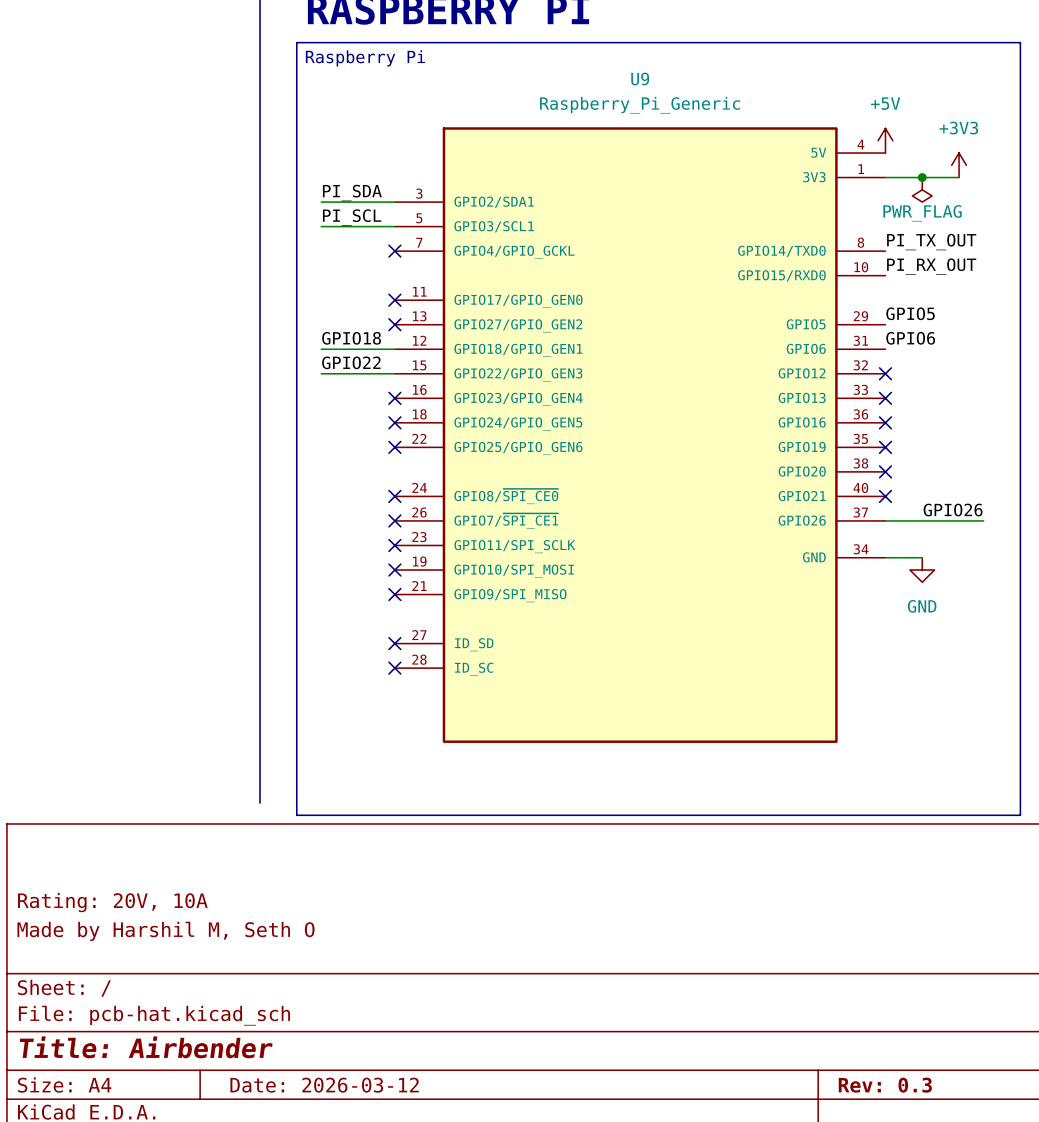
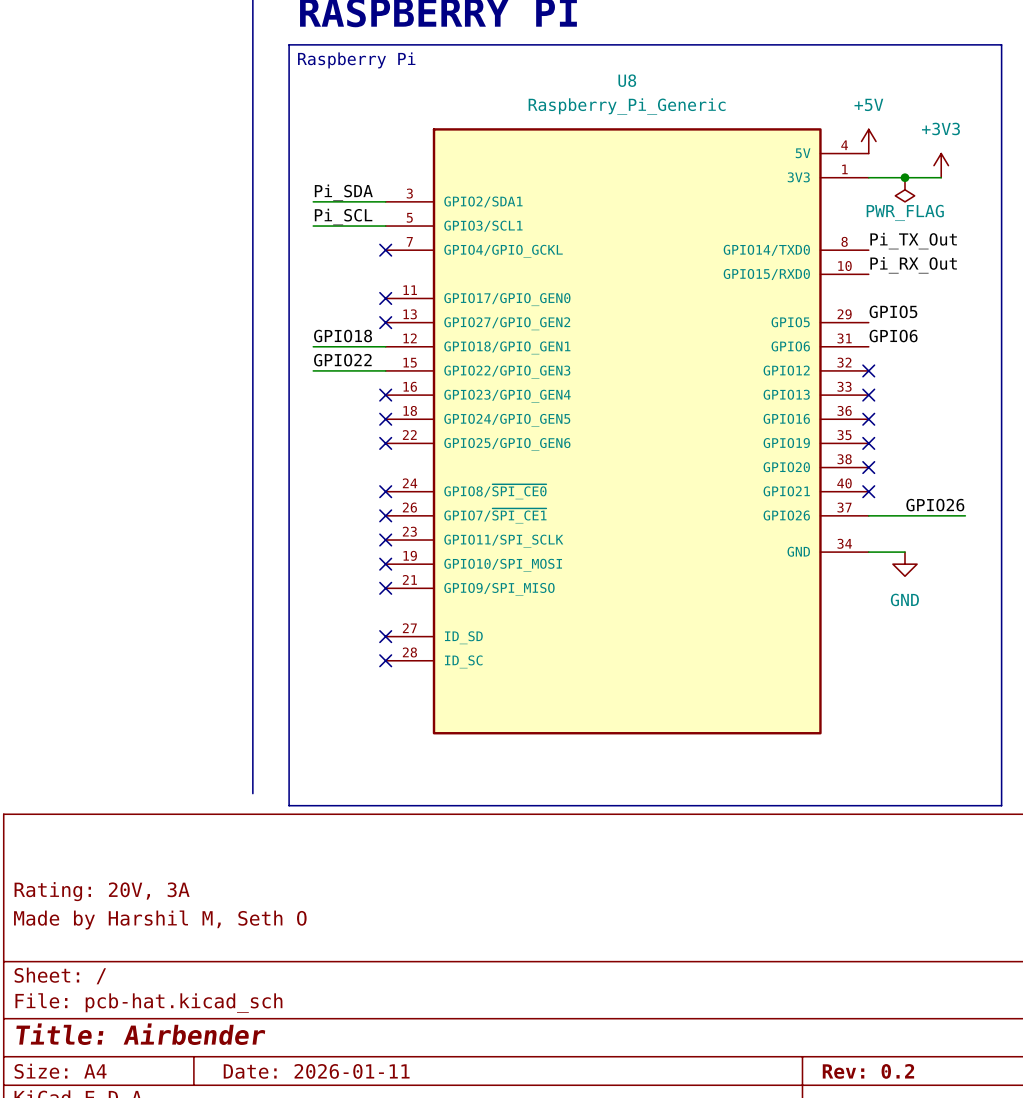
U9 name: U9 (640, 78) -> U8 (627, 80)
label: PI_SDA (352, 193) -> Pi_SDA (343, 192)
label: PI_SCL (352, 217) -> Pi_SCL (343, 216)
label: PI_TX_OUT (931, 242) -> Pi_TX_Out (913, 241)
label: PI_RX_OUT (931, 266) -> Pi_RX_Out (913, 265)
title block: Rating: 20V, 10A (112, 902) -> Rating: 20V, 3A (102, 891)
title block: Date: 2026-03-12 (324, 1085) -> Date: 2026-01-11 (316, 1071)
title block: Rev: 0.3 (885, 1085) -> Rev: 0.2 (868, 1071)

